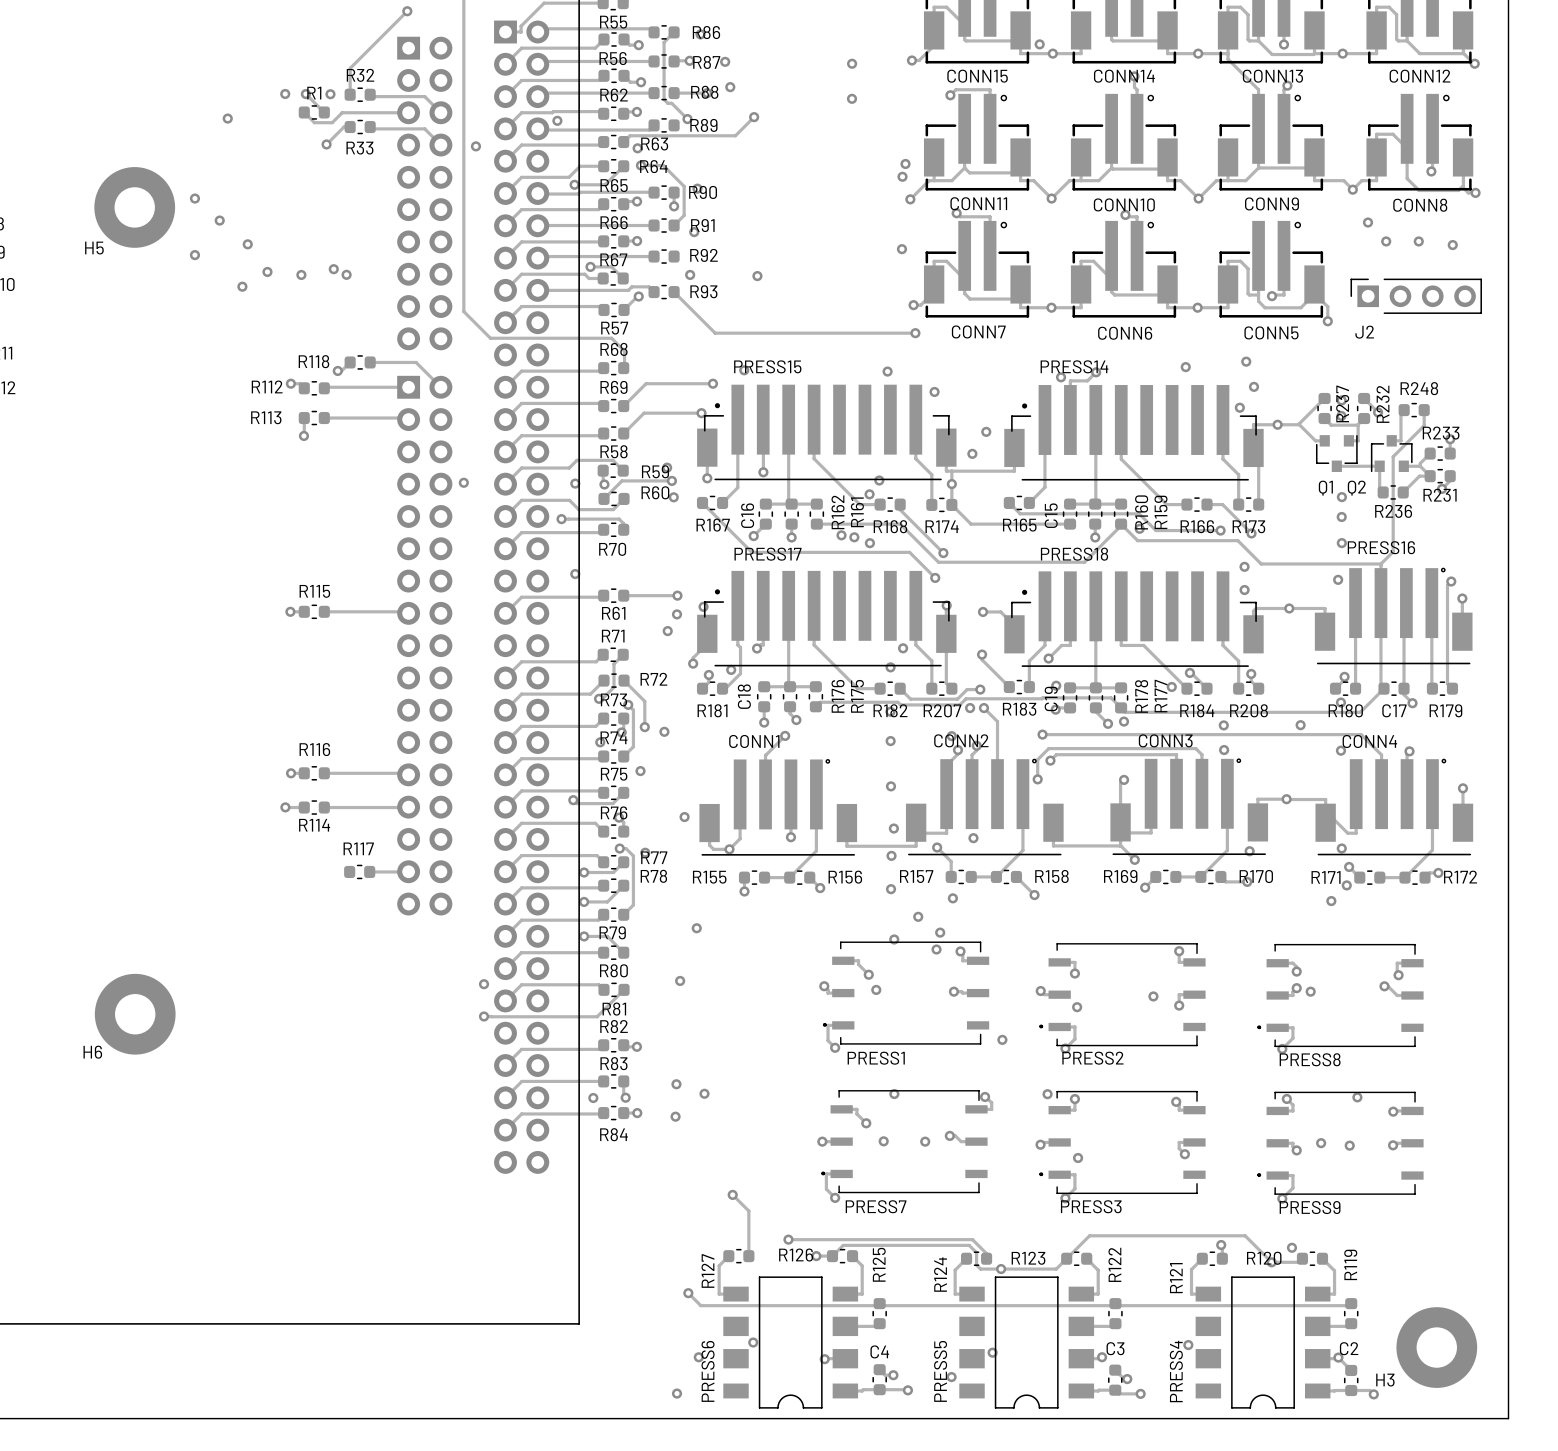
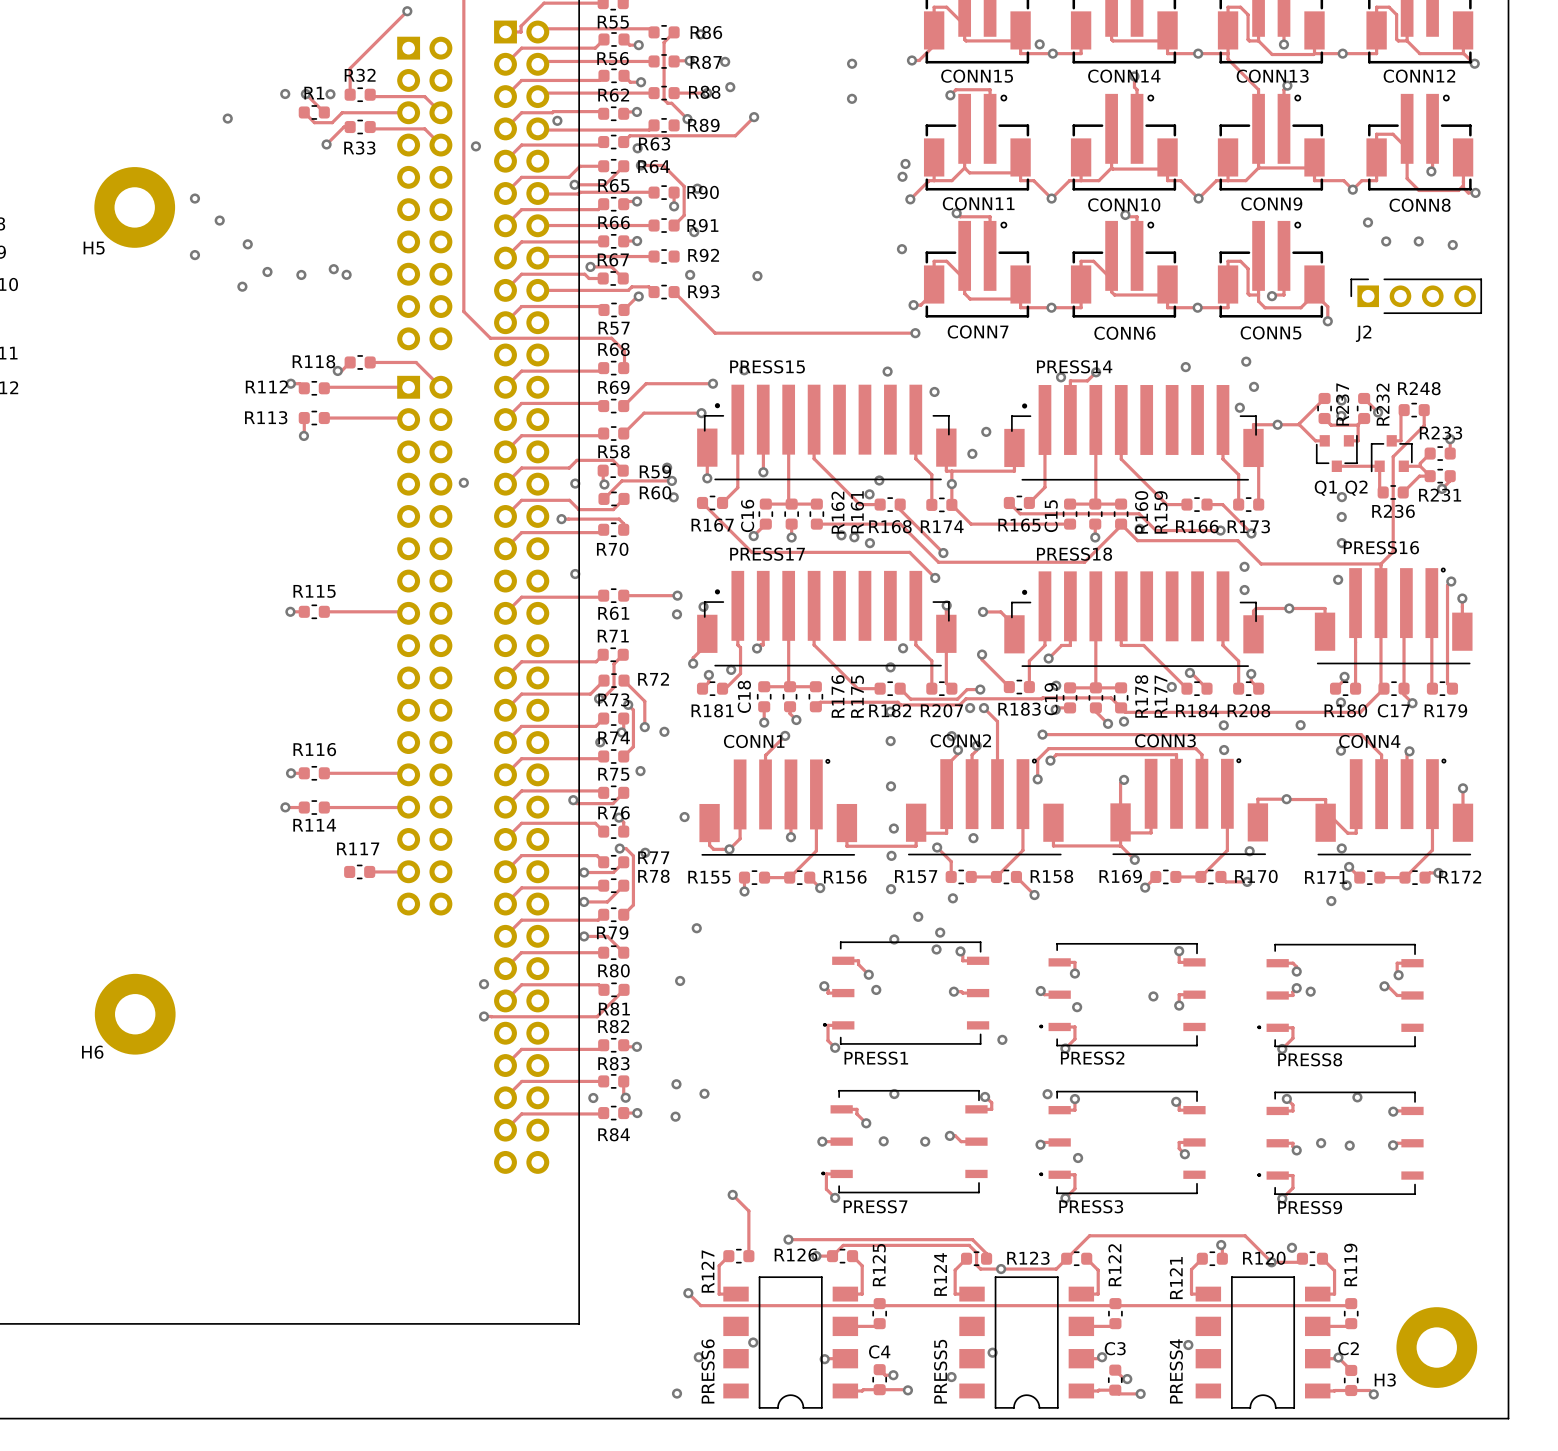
via: (667, 631) -> none

